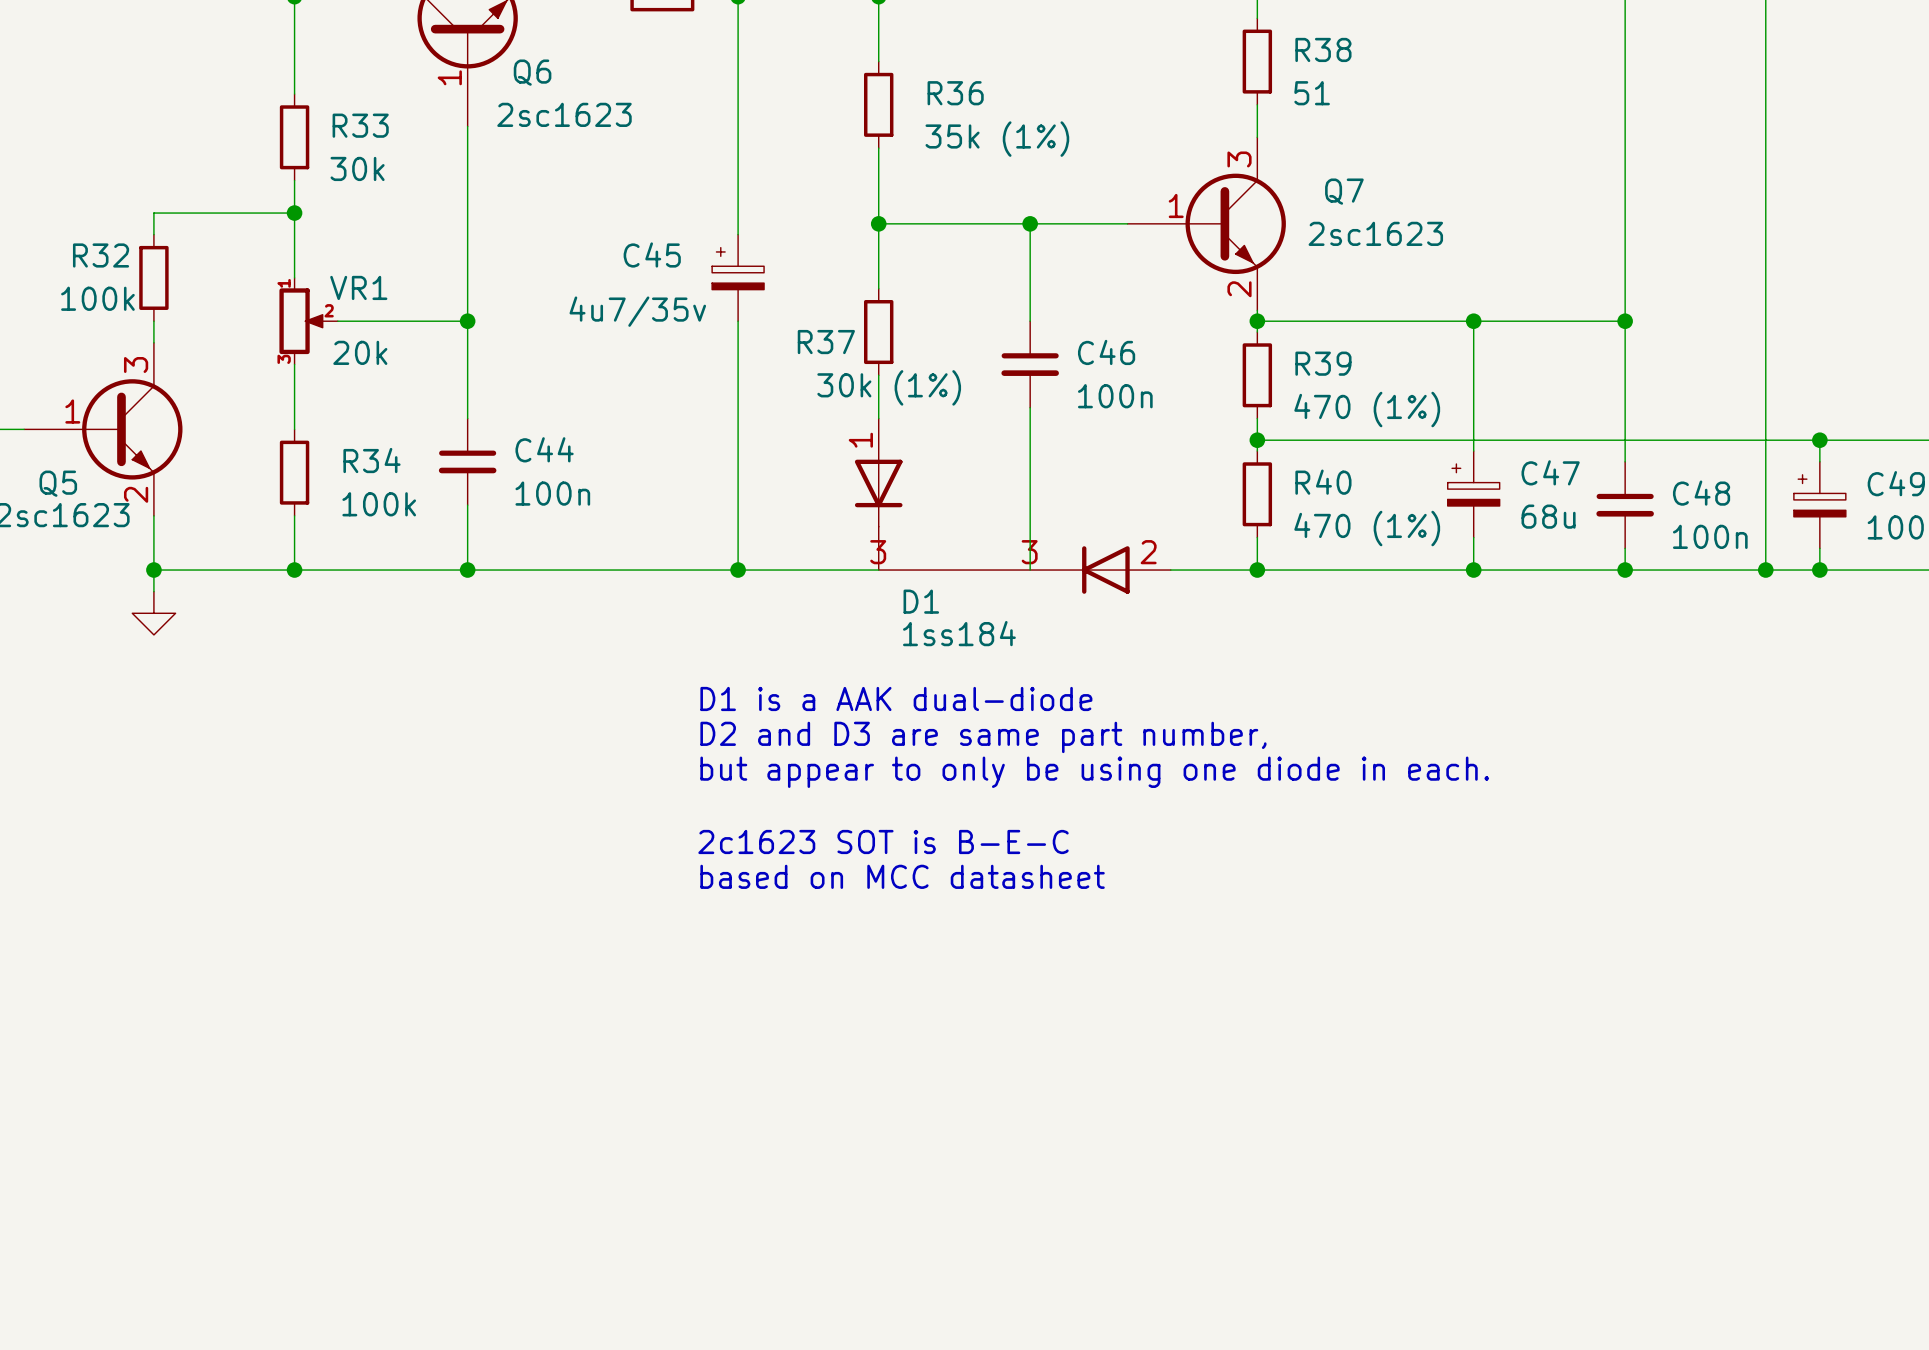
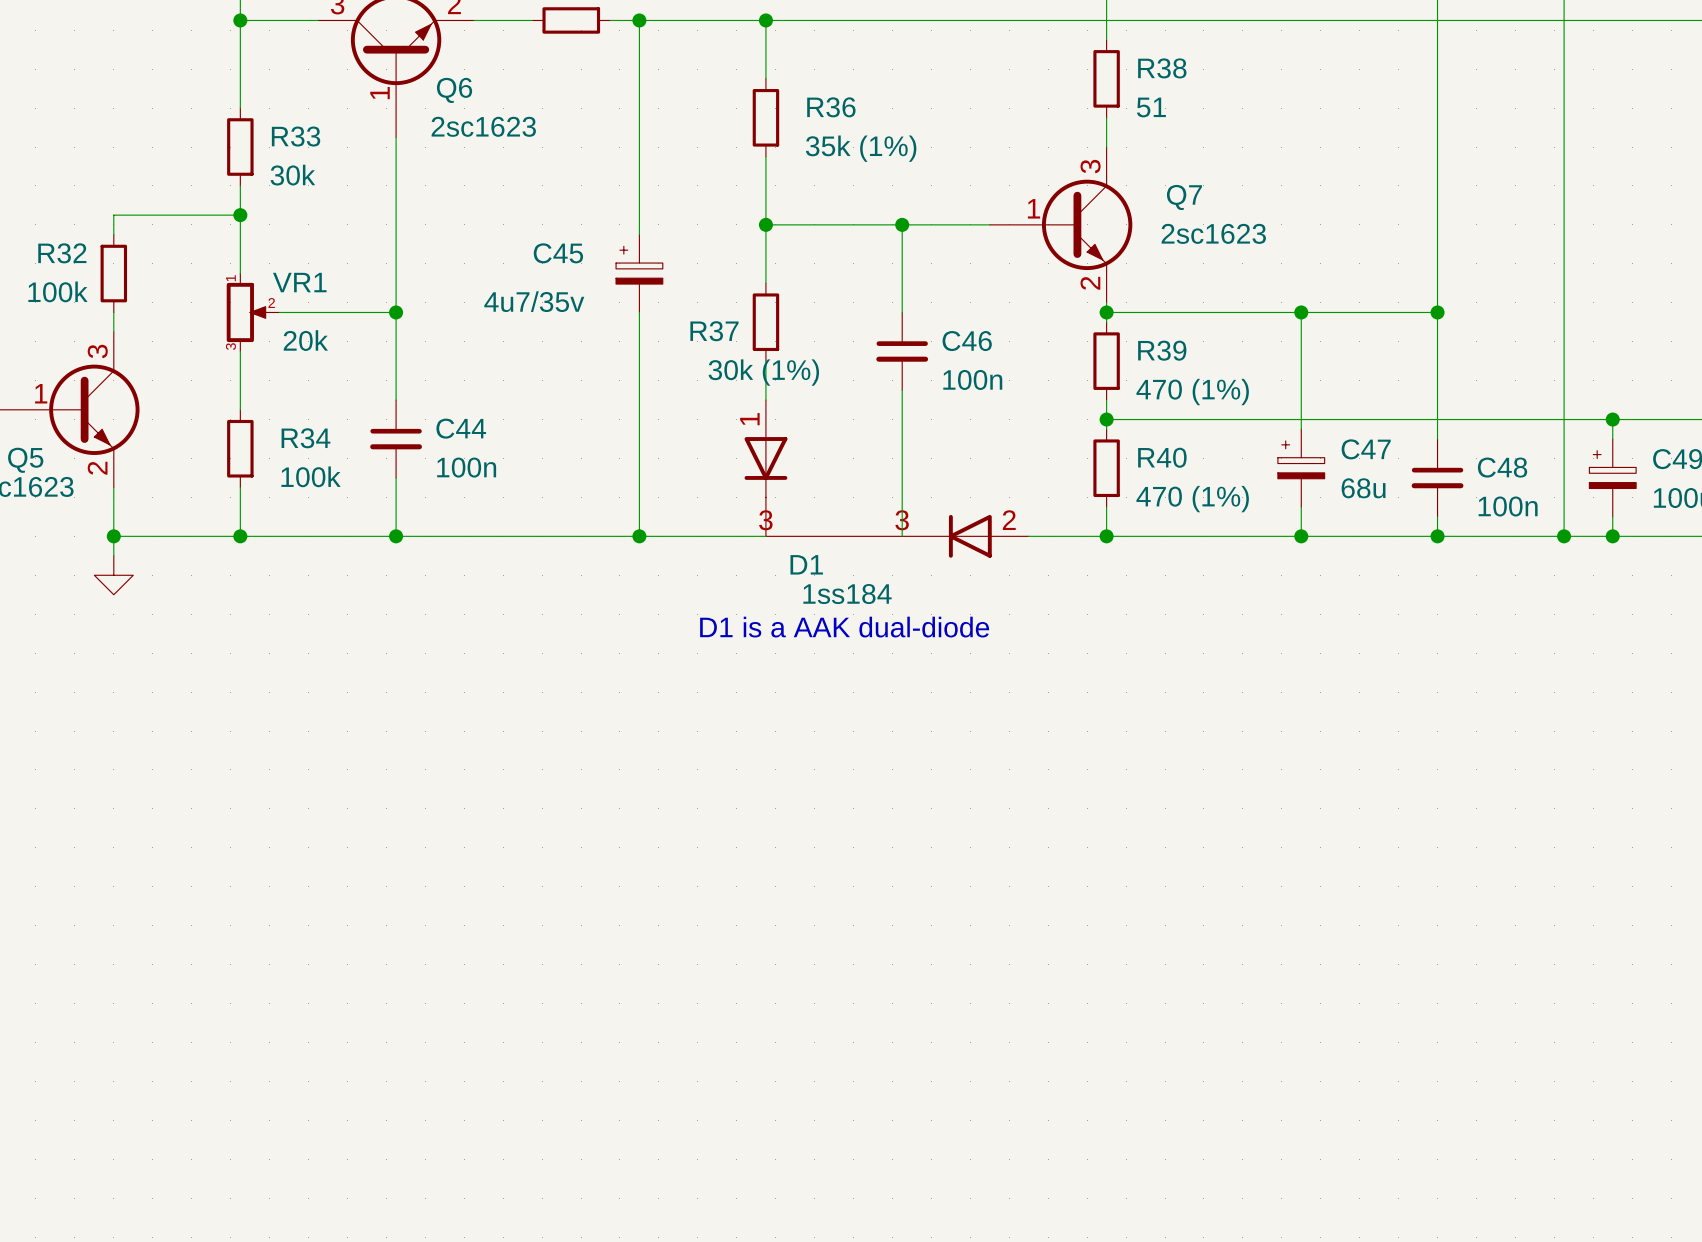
text position: D1 is a AAK dual-diode (896, 698) -> D1 is a AAK dual-diode (844, 627)
text: D2 and D3 are same part number, (983, 737) -> none
text: but appear to only be using one diode in each. (1094, 772) -> none
text: 2c1623 SOT is B-E-C (883, 841) -> none
text: based on MCC datasheet (902, 876) -> none

